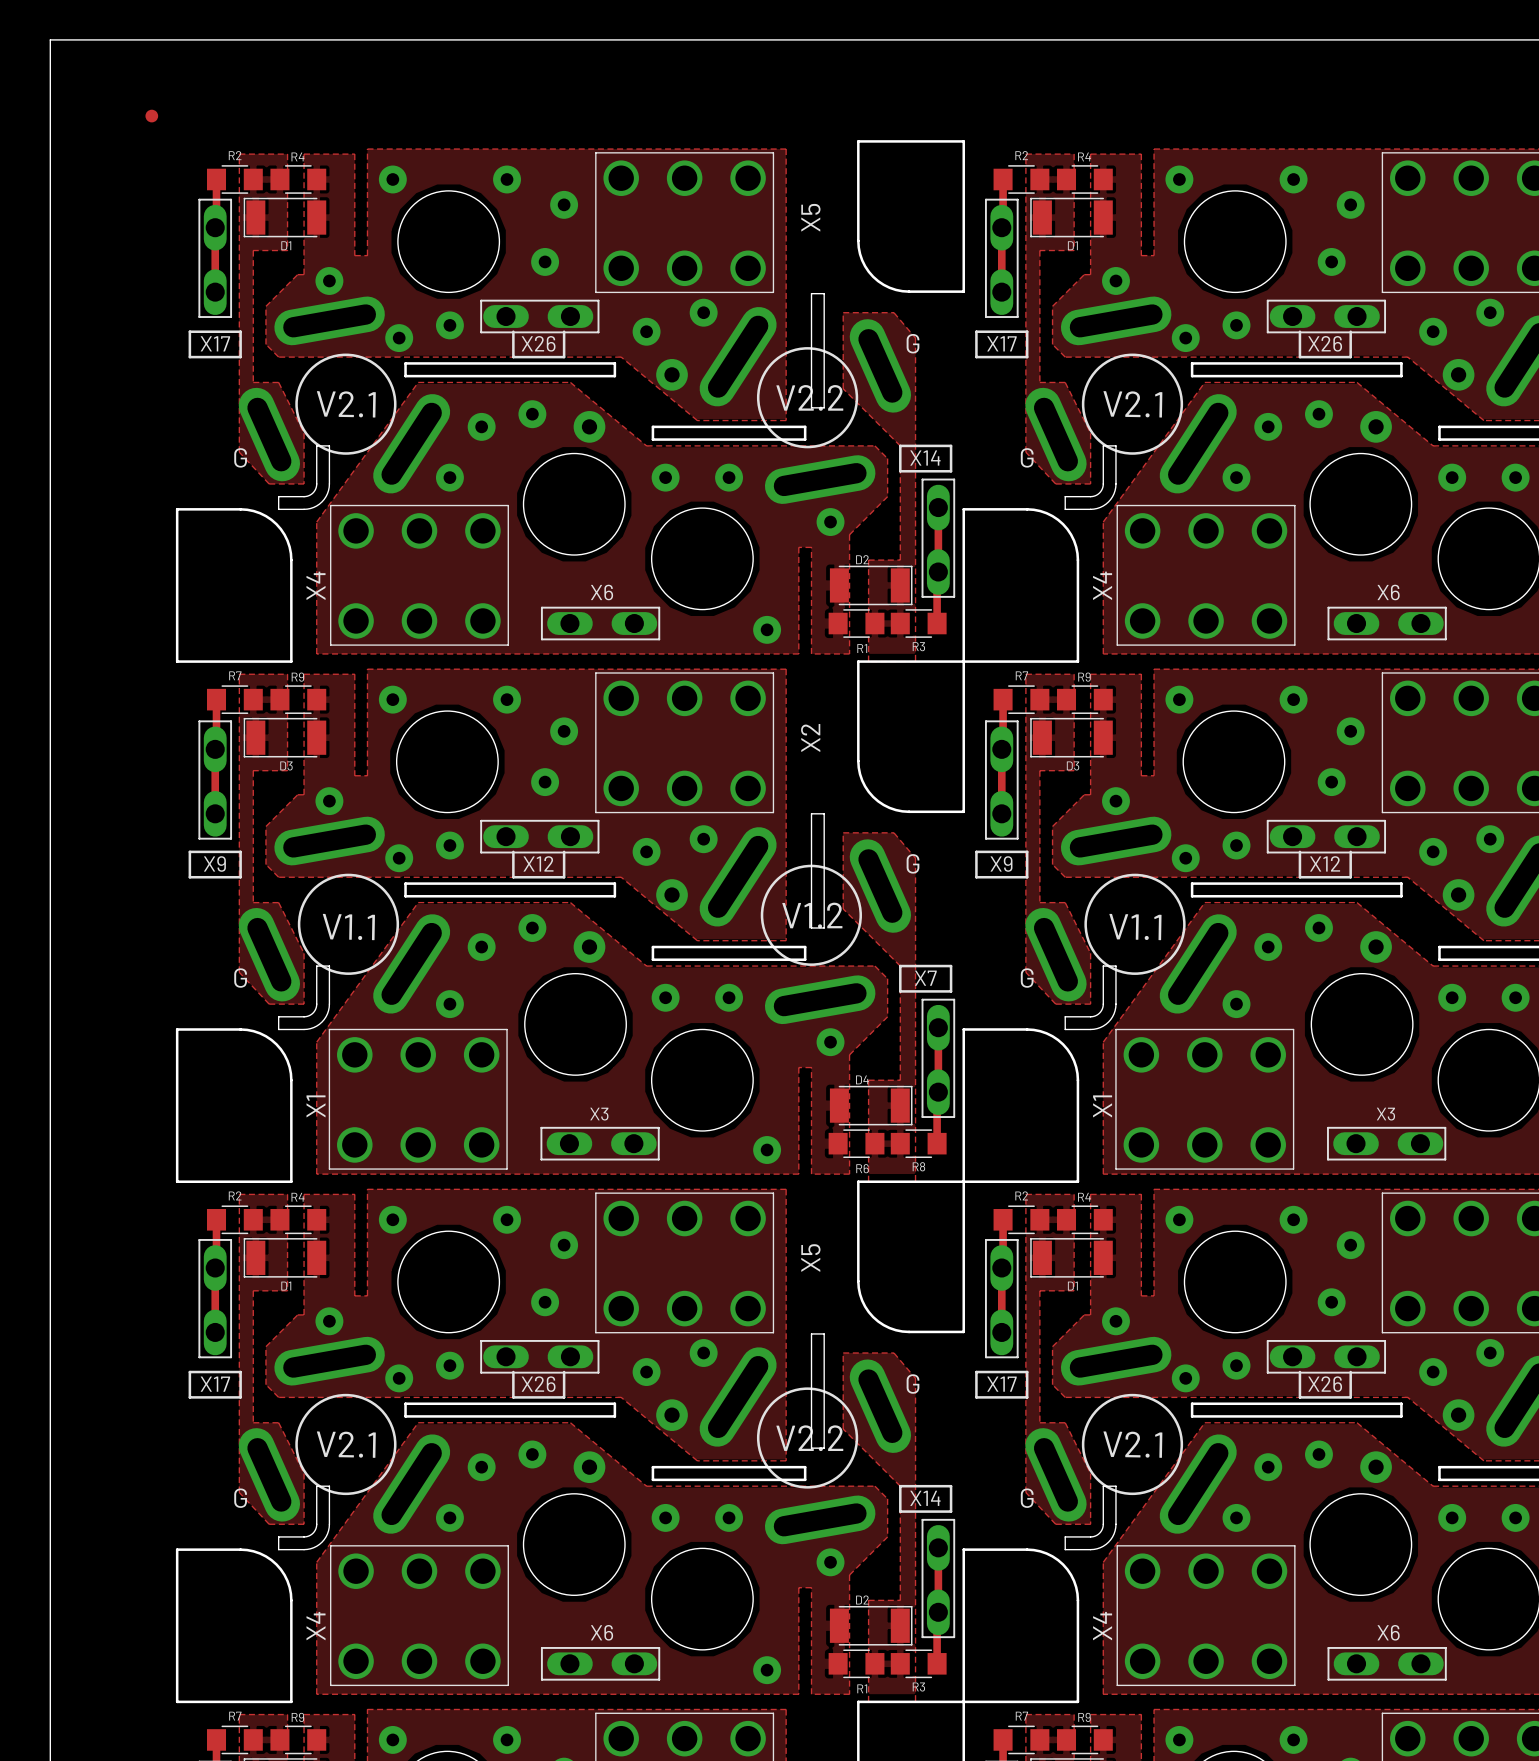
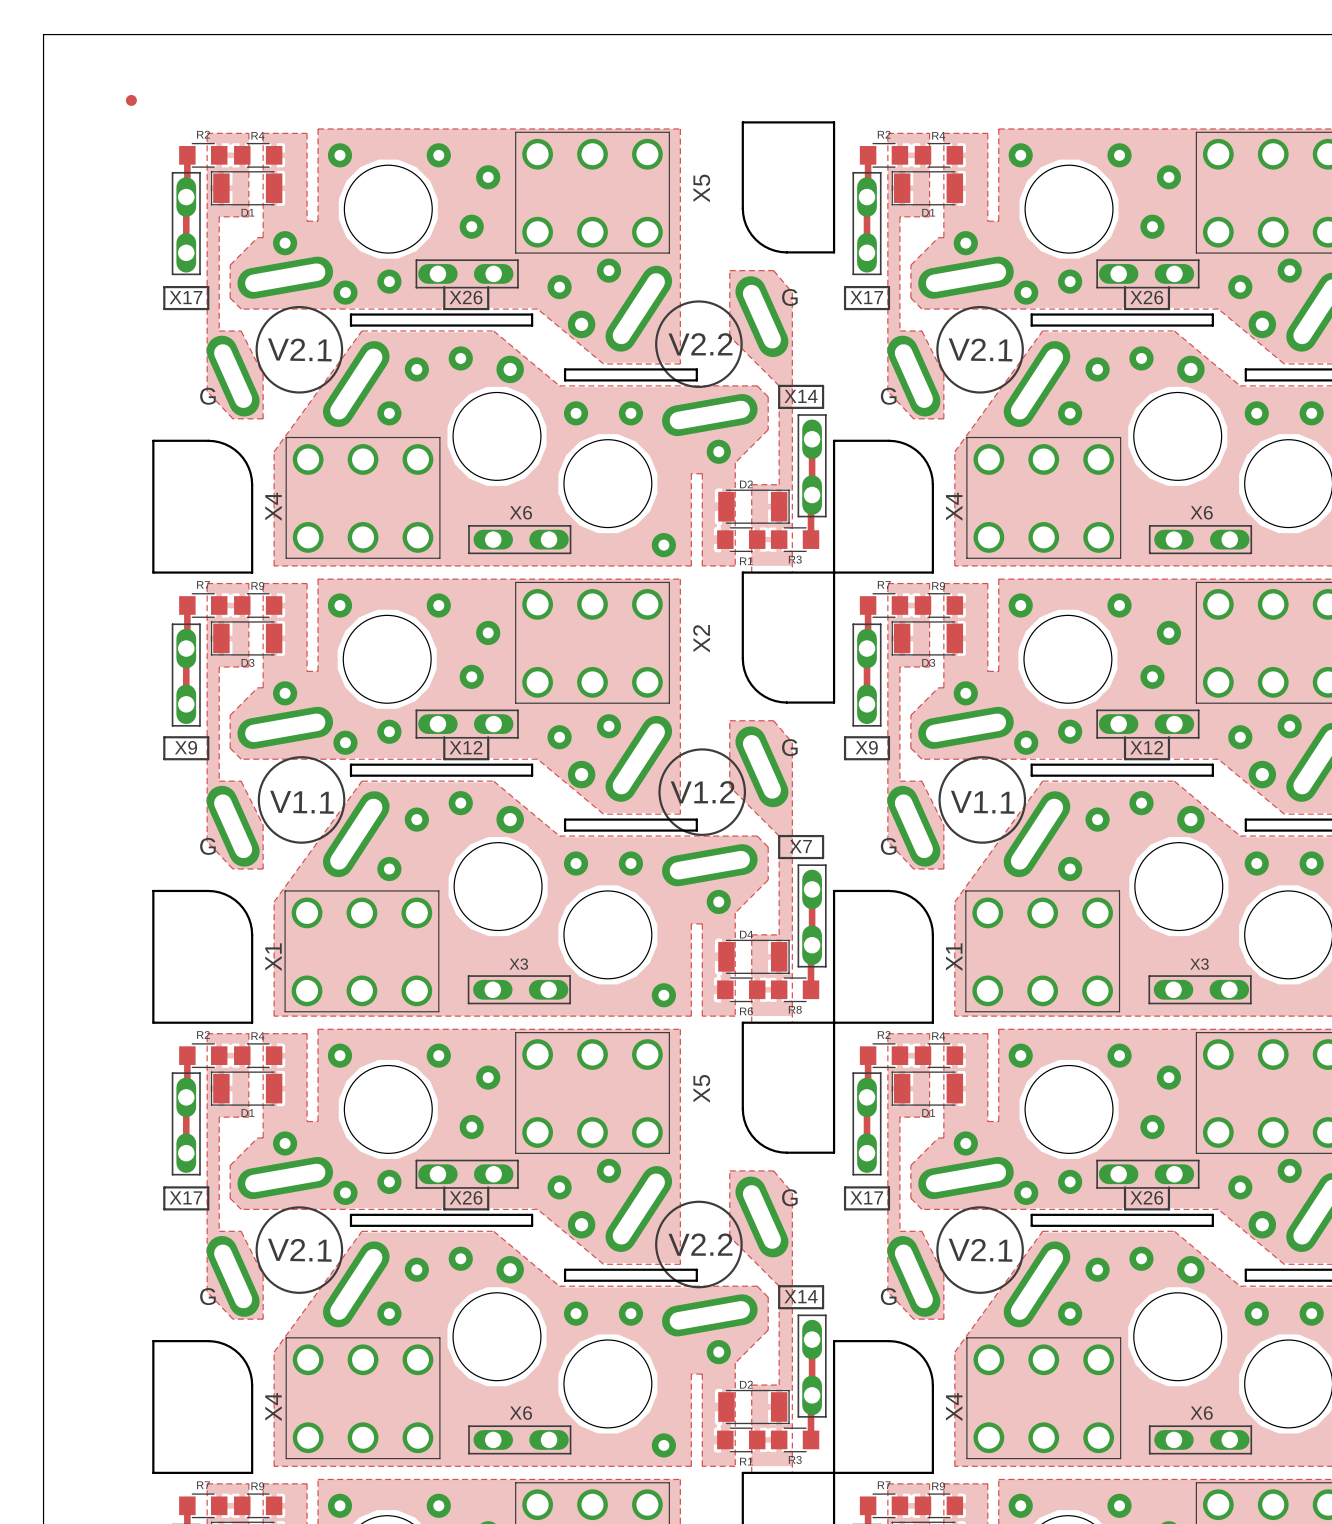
board edge: (811, 293) (811, 407) (824, 407) (824, 293) (811, 293) -> none
board edge: (316, 445) (315, 490) (305, 496) (278, 496) (278, 509) (310, 508) (319, 504) (326, 496) (329, 487) (329, 445) (316, 445) -> none
board edge: (1103, 445) (1101, 490) (1092, 496) (1065, 496) (1065, 509) (1097, 508) (1106, 504) (1112, 496) (1115, 487) (1115, 445) (1103, 445) -> none
board edge: (811, 813) (811, 927) (824, 927) (824, 813) (811, 813) -> none
board edge: (316, 966) (315, 1010) (305, 1016) (278, 1016) (278, 1029) (310, 1028) (319, 1024) (326, 1016) (329, 1007) (329, 966) (316, 966) -> none
board edge: (1103, 966) (1101, 1010) (1092, 1016) (1065, 1016) (1065, 1029) (1097, 1028) (1106, 1024) (1112, 1016) (1115, 1007) (1115, 966) (1103, 966) -> none
board edge: (811, 1333) (824, 1333) (824, 1448) (811, 1448) (811, 1333) -> none
board edge: (316, 1486) (315, 1530) (305, 1536) (278, 1536) (278, 1549) (310, 1548) (319, 1544) (326, 1536) (329, 1527) (329, 1486) (316, 1486) -> none
board edge: (1103, 1486) (1115, 1486) (1115, 1527) (1112, 1536) (1106, 1544) (1097, 1548) (1065, 1549) (1065, 1536) (1092, 1536) (1101, 1530) (1103, 1486) -> none

